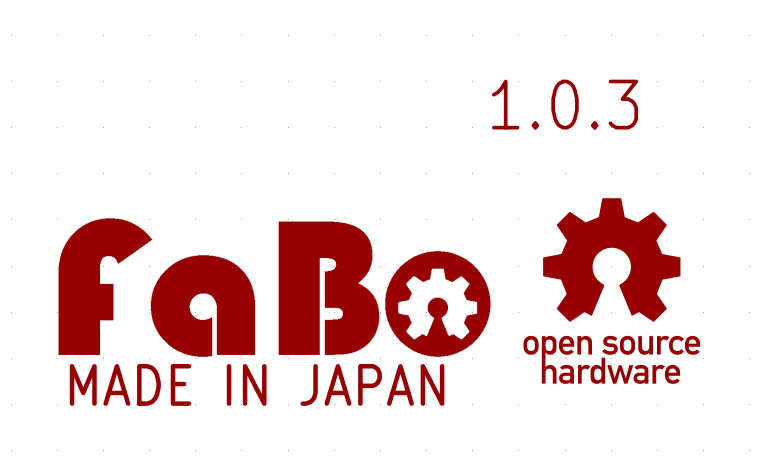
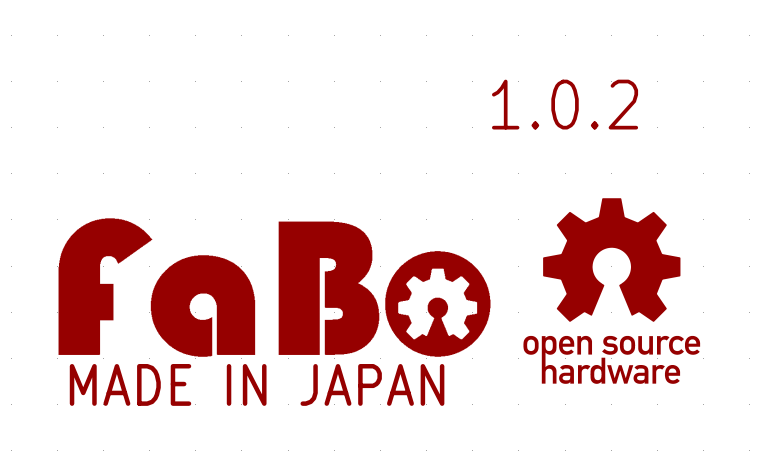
text: 1.0.3 (565, 104) -> 1.0.2 (565, 104)

